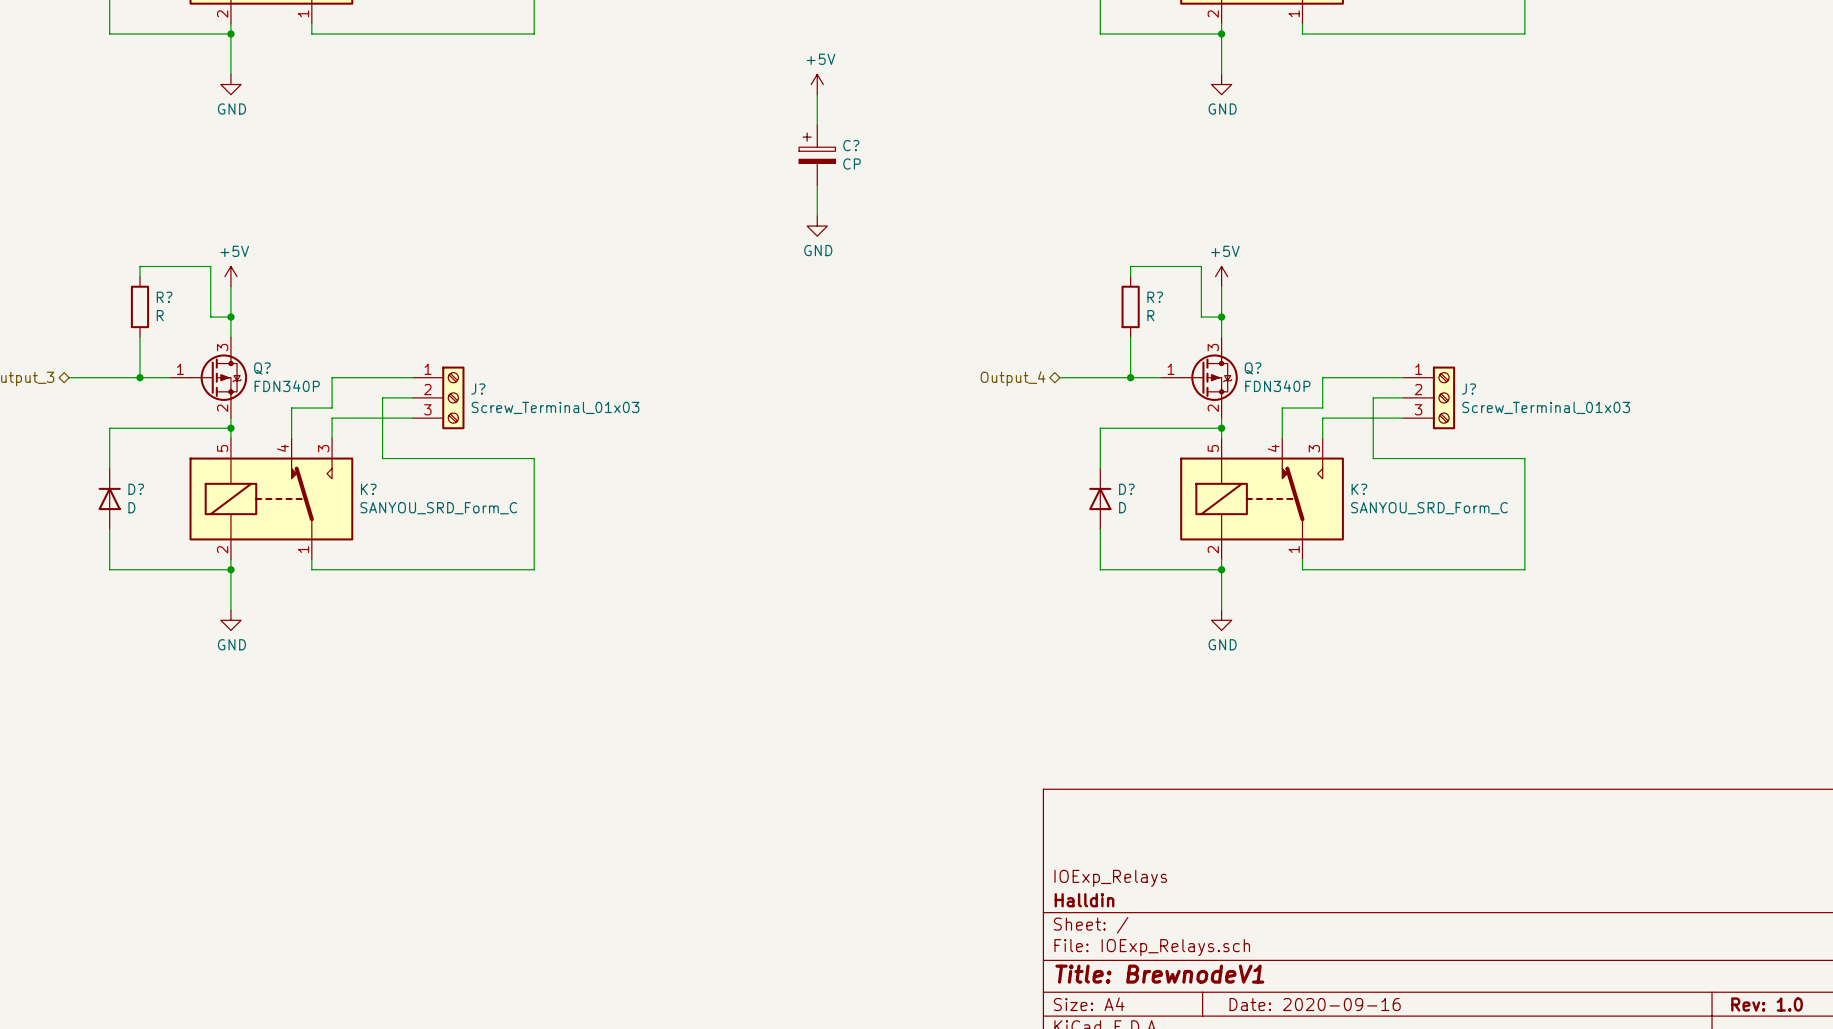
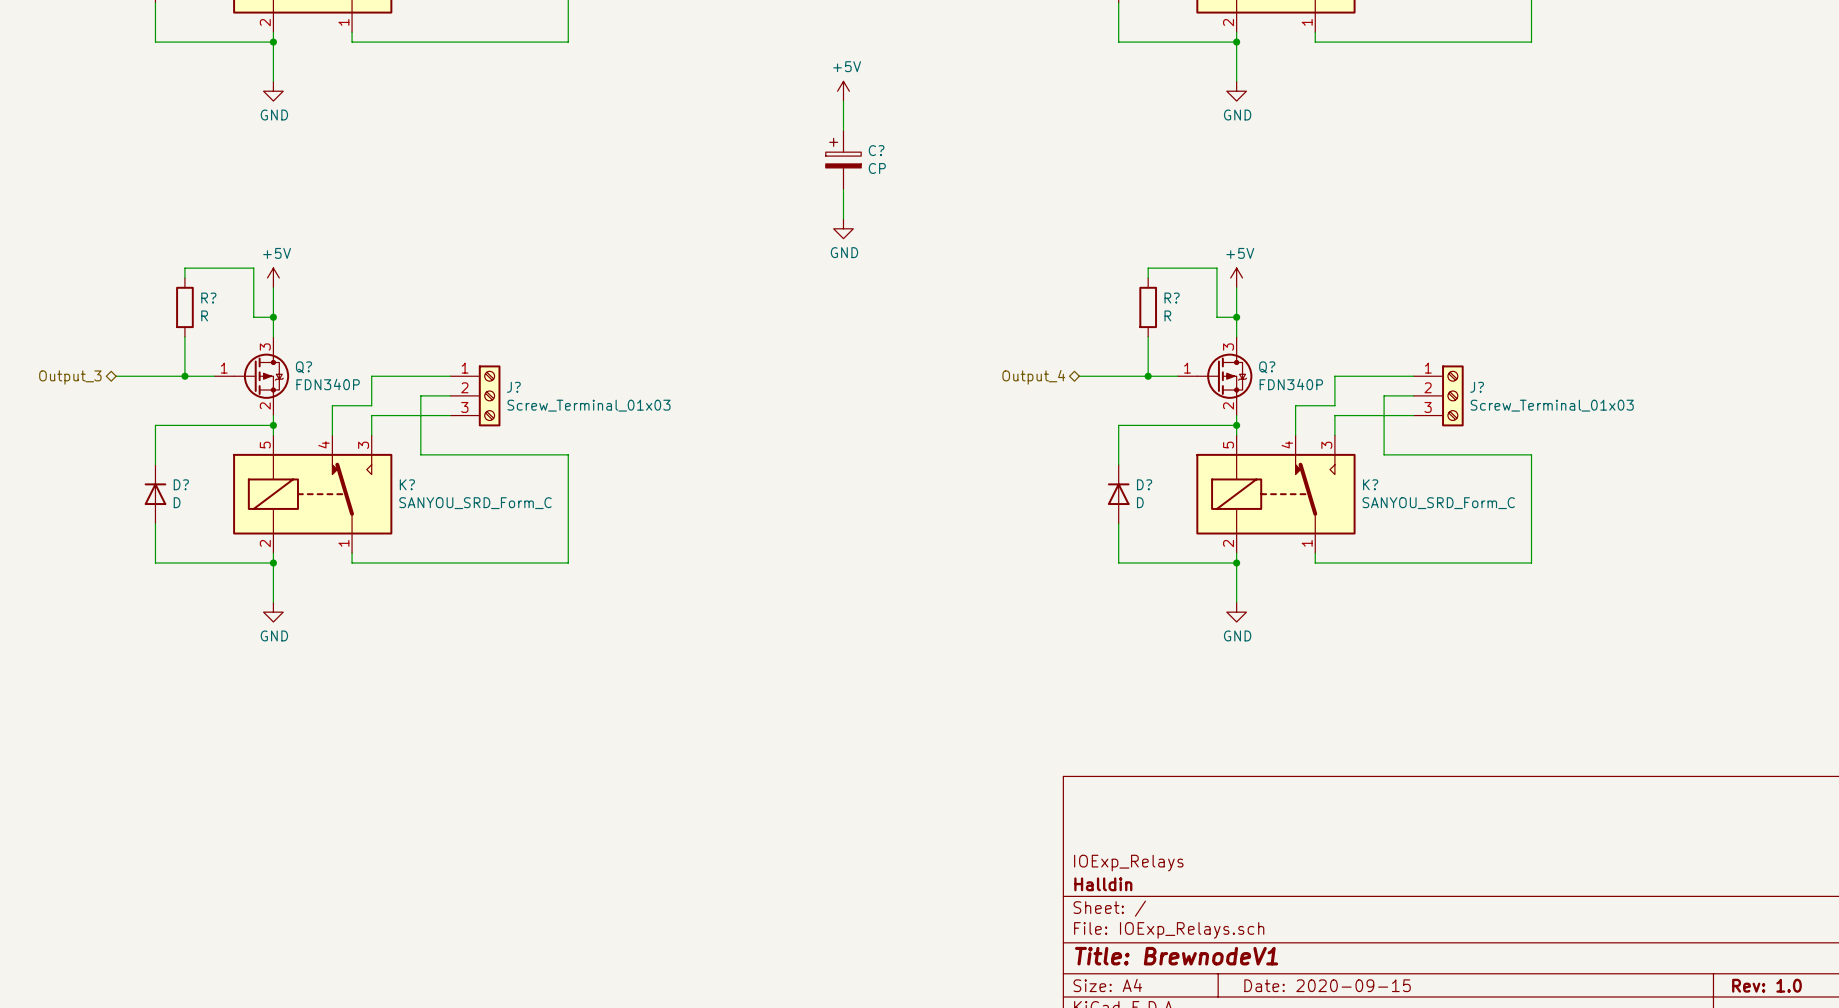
title block: Date: 2020-09-16 (1315, 1004) -> Date: 2020-09-15 (1327, 985)

